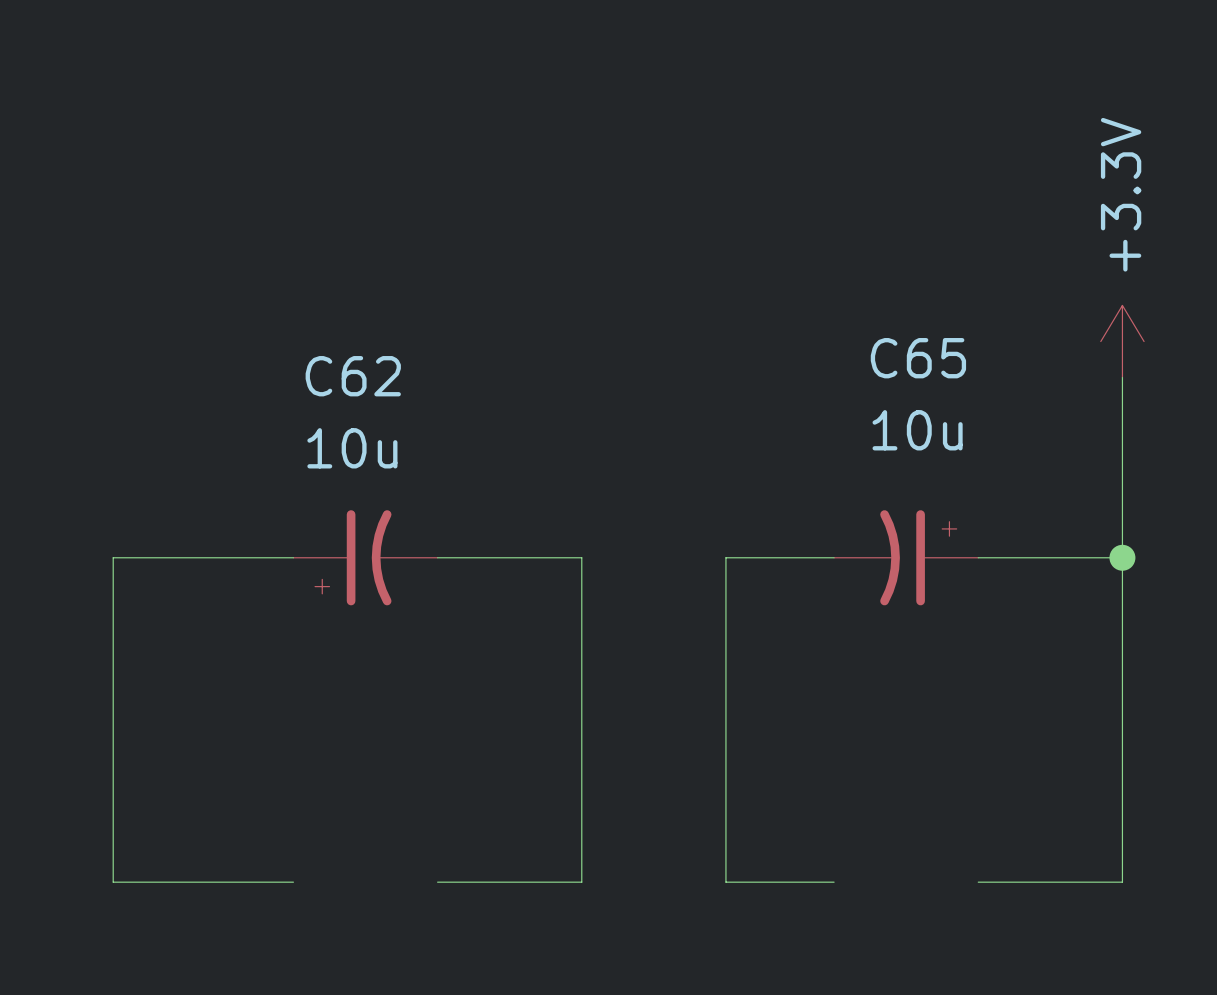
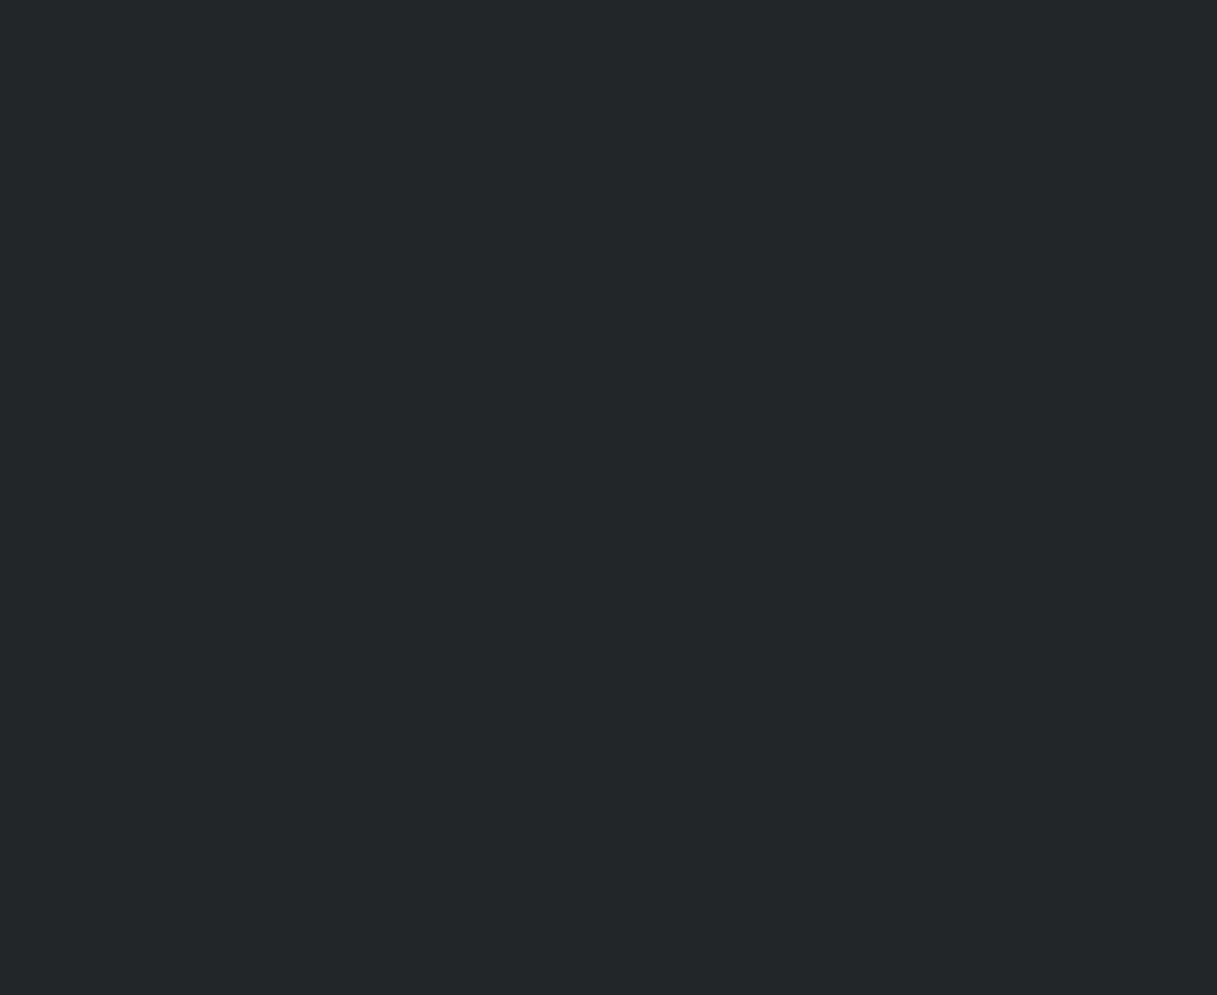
power symbol: +3.3V (1122, 341) -> none
wire: (1122, 377) (1122, 882) (978, 882) -> none
wire: (293, 557) (113, 557) (113, 882) (293, 882) -> none
C62: 10u (365, 557) -> none
wire: (437, 557) (581, 557) (581, 882) (437, 882) -> none
wire: (834, 557) (725, 557) (725, 882) (834, 882) -> none
C65: 10u (906, 557) -> none
wire: (978, 557) (1122, 557) -> none
junction: (1122, 557) -> none

